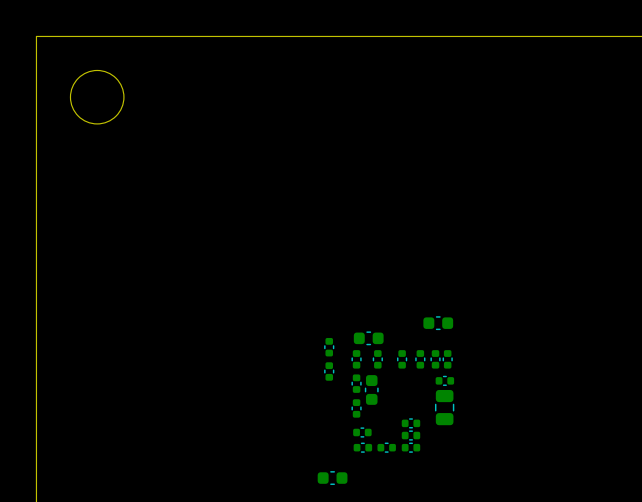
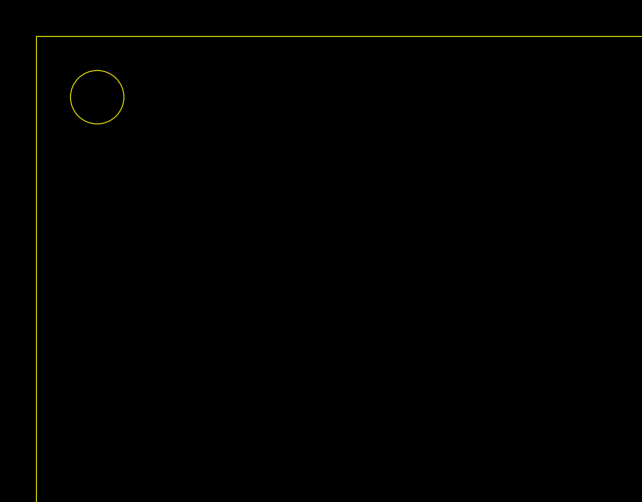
part: (438, 323) -> none
part: (368, 338) -> none
part: (329, 347) -> none
part: (356, 359) -> none
part: (377, 359) -> none
part: (402, 359) -> none
part: (420, 359) -> none
part: (435, 359) -> none
part: (447, 359) -> none
part: (329, 371) -> none
part: (444, 380) -> none
part: (356, 383) -> none
part: (371, 389) -> none
part: (444, 407) -> none
part: (356, 408) -> none
part: (410, 423) -> none
part: (362, 432) -> none
part: (410, 435) -> none
part: (362, 447) -> none
part: (386, 447) -> none
part: (410, 447) -> none
part: (332, 478) -> none

